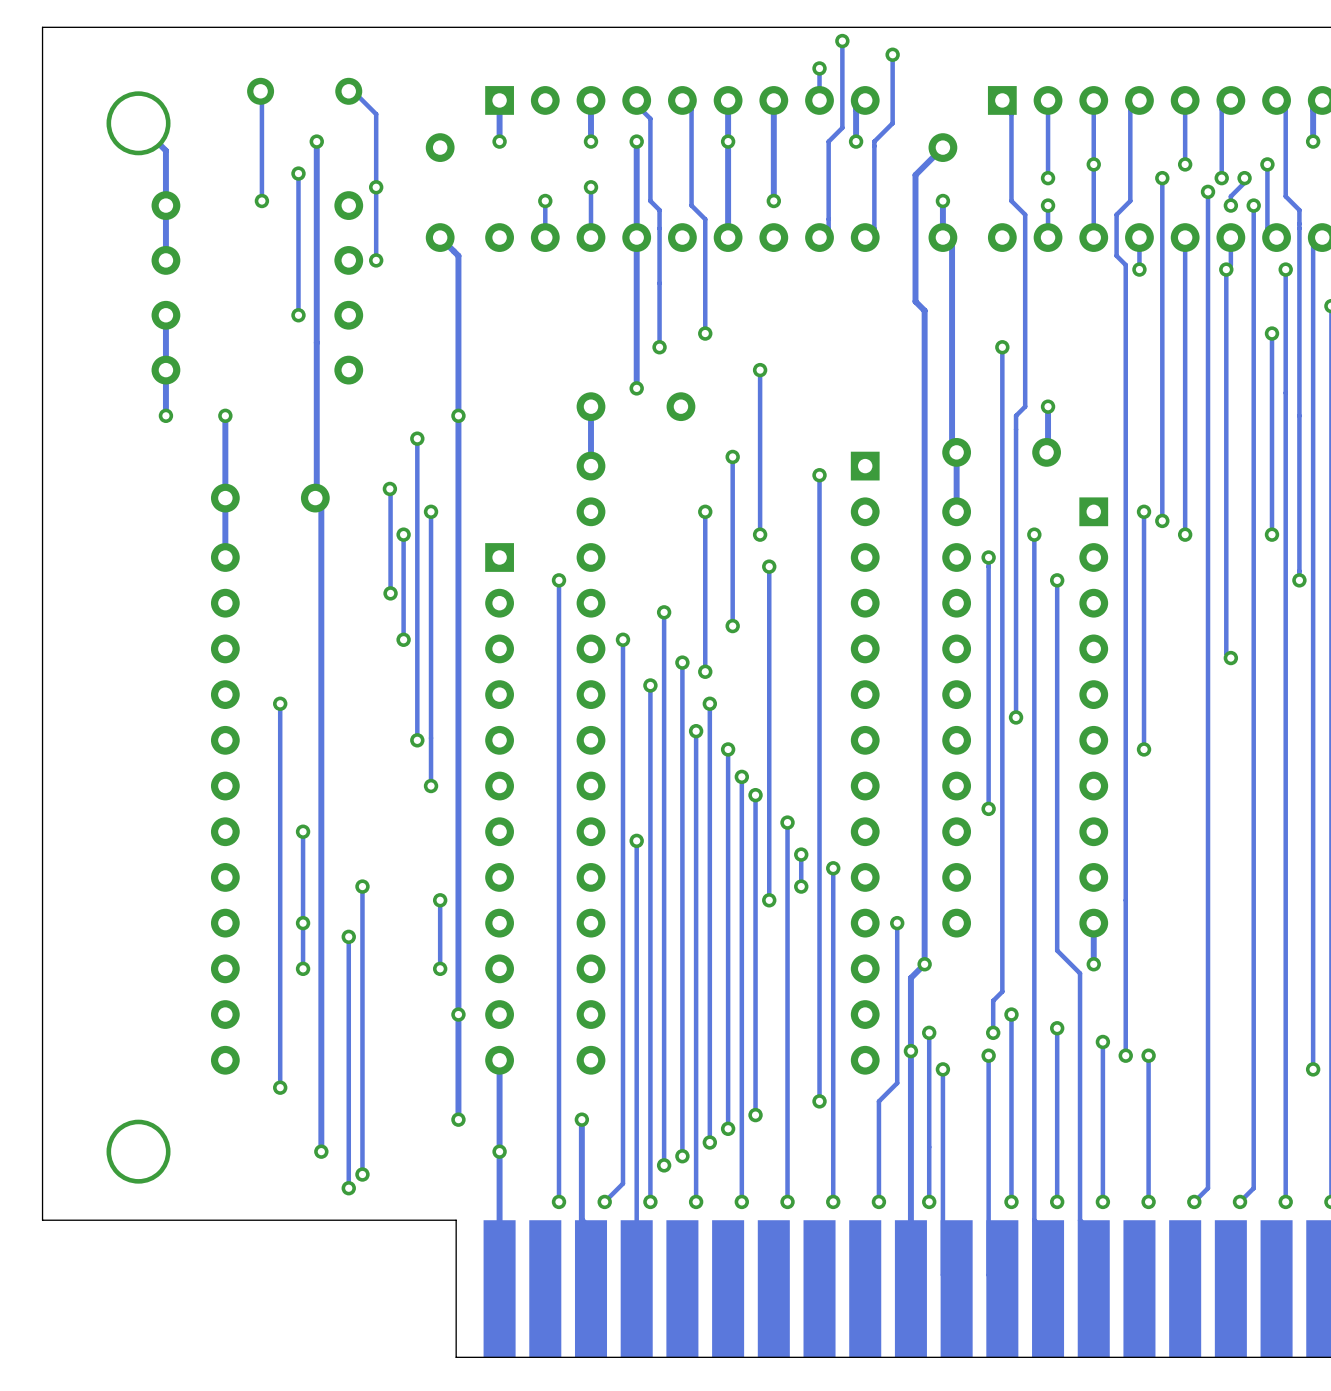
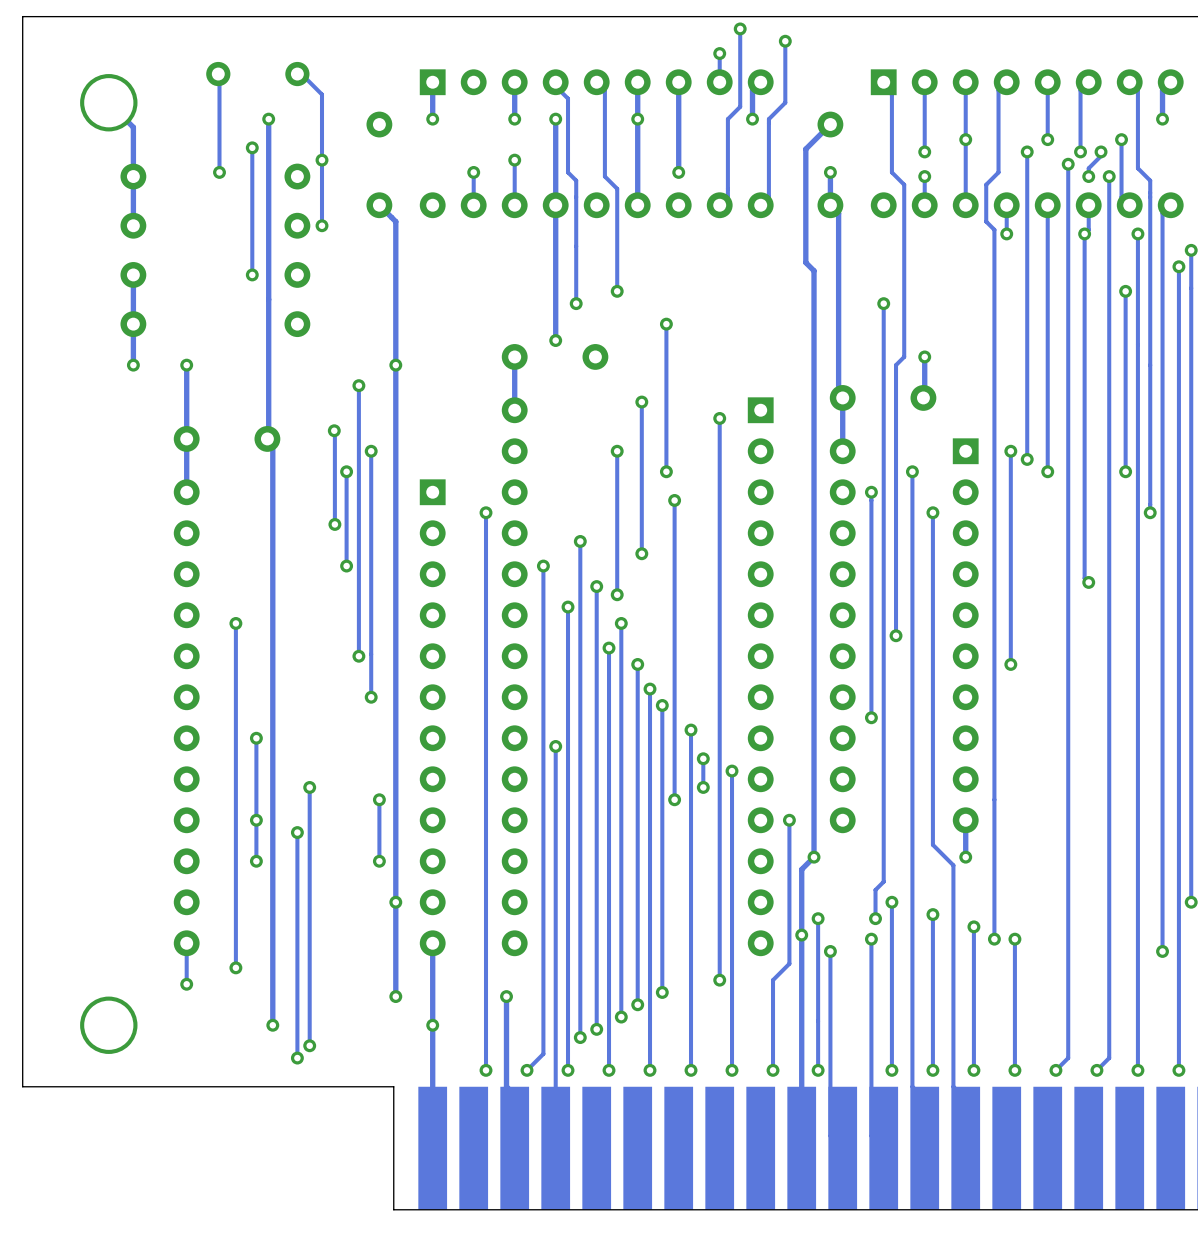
track: none -> (186, 943) (186, 984)
via: none -> (186, 984)

